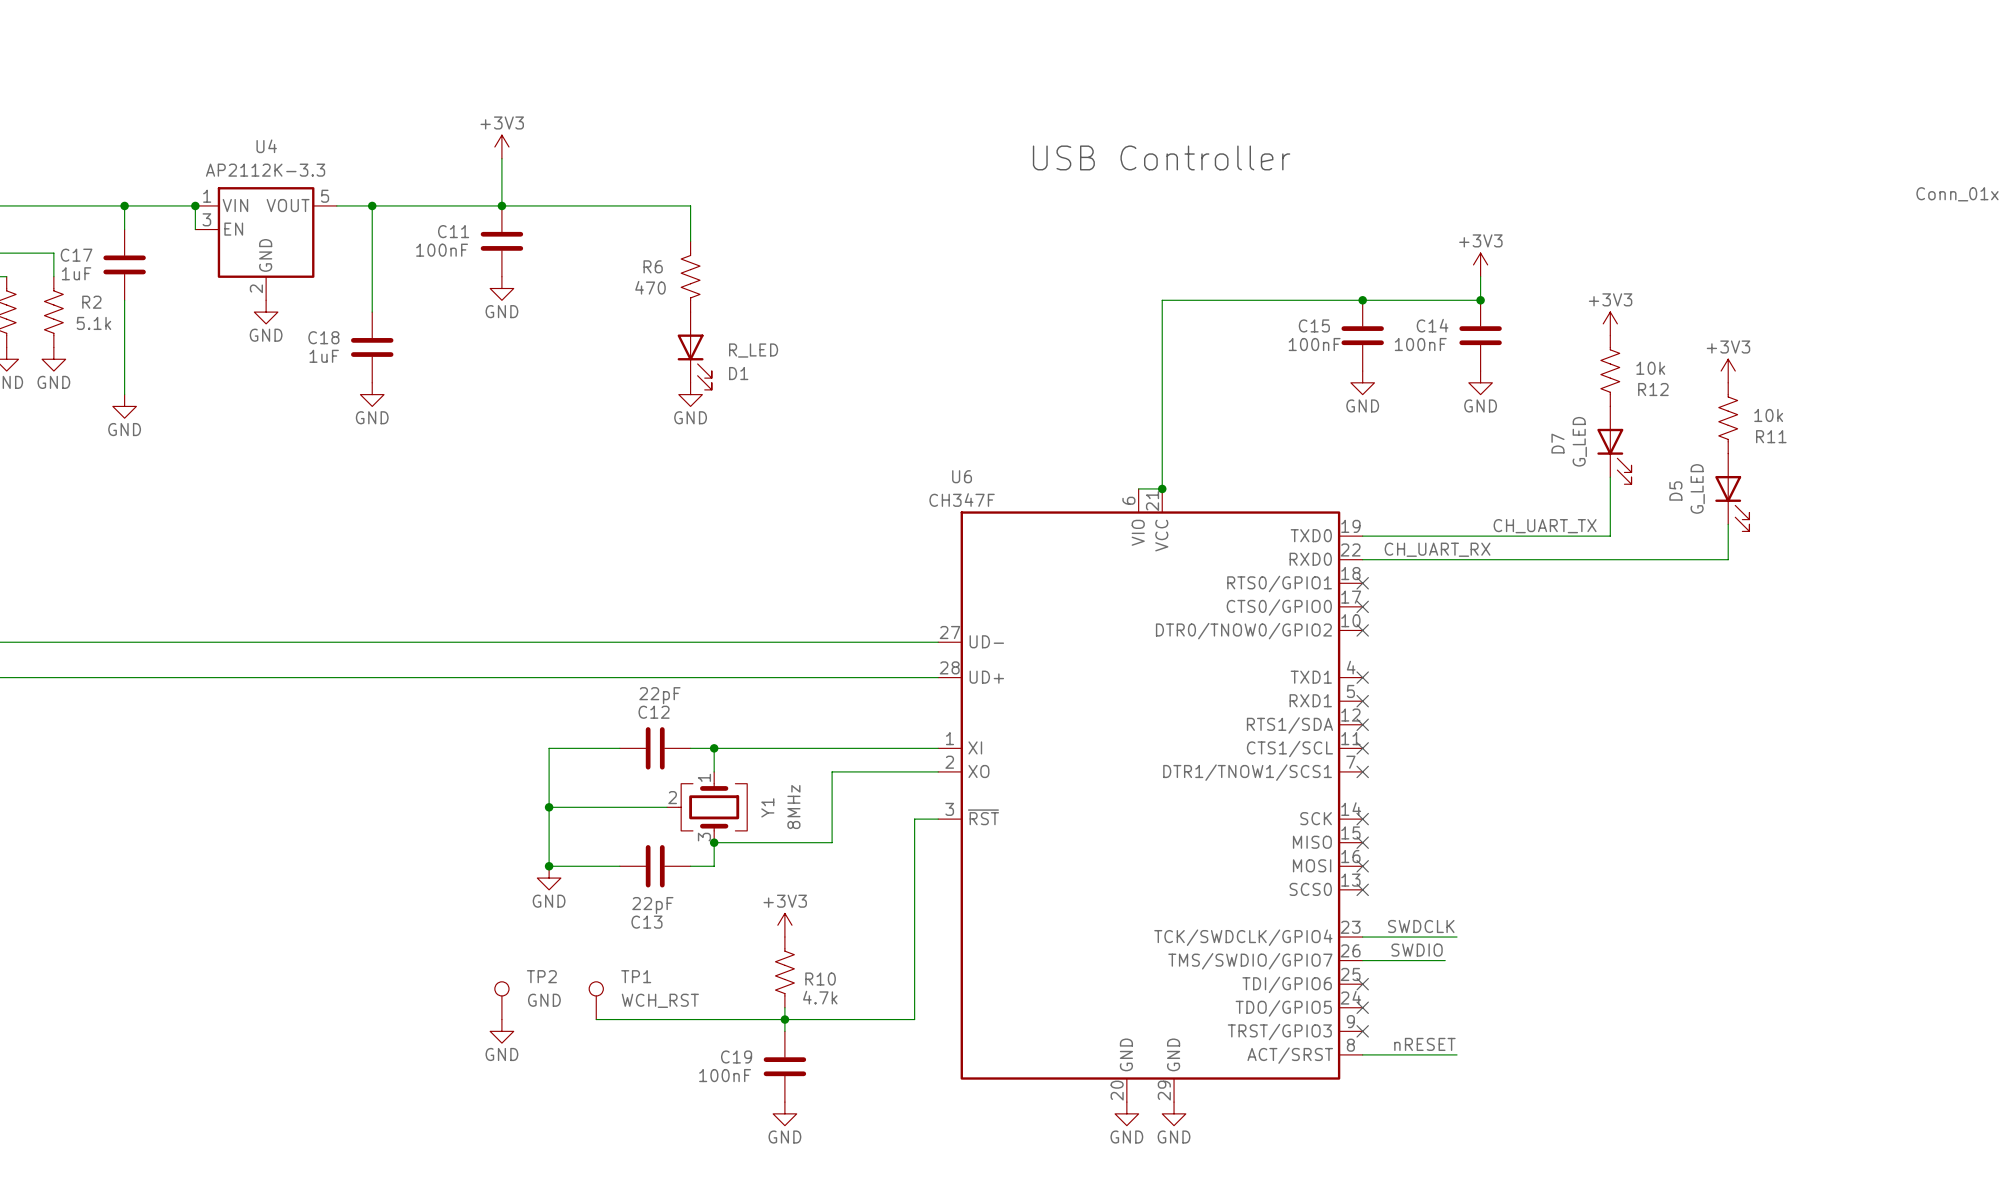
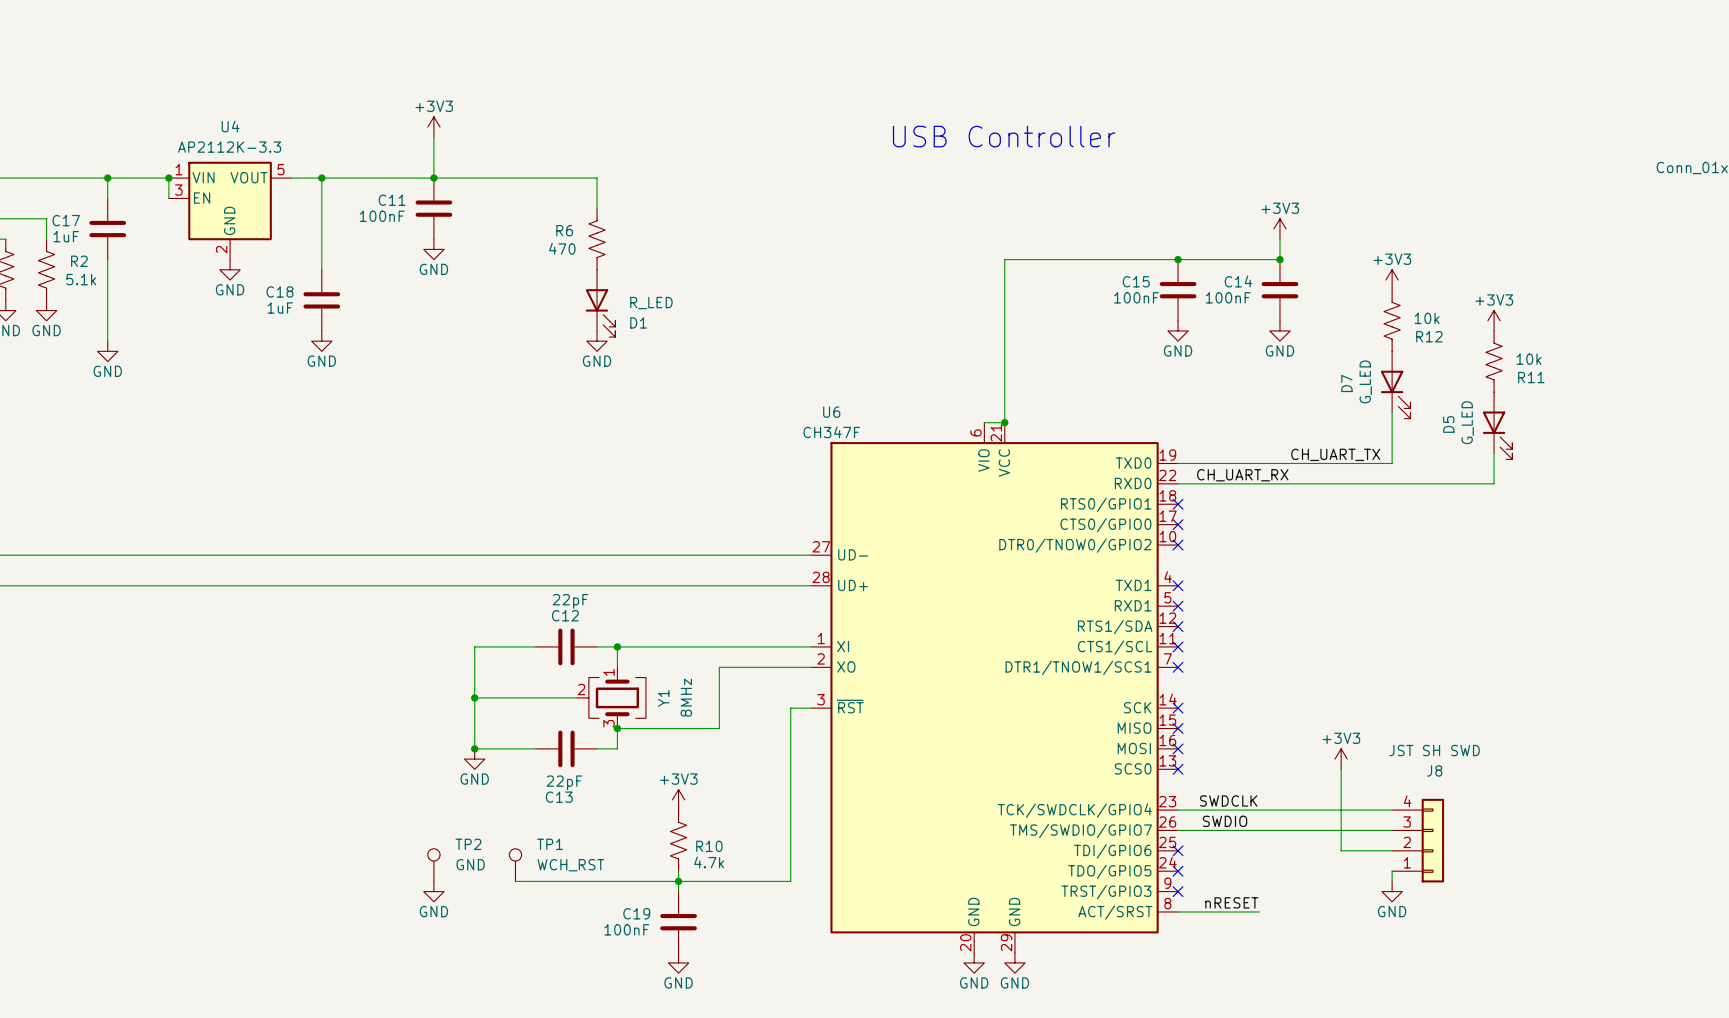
power symbol: none -> +3V3 (1341, 759)
wire: none -> (1341, 769) (1341, 850) (1392, 850)
wire: none -> (1259, 810) (1392, 810)
wire: none -> (1249, 830) (1392, 830)
J8: none -> JST SH SWD (1418, 840)
wire: none -> (1392, 871) (1392, 881)
power symbol: none -> GND (1392, 891)

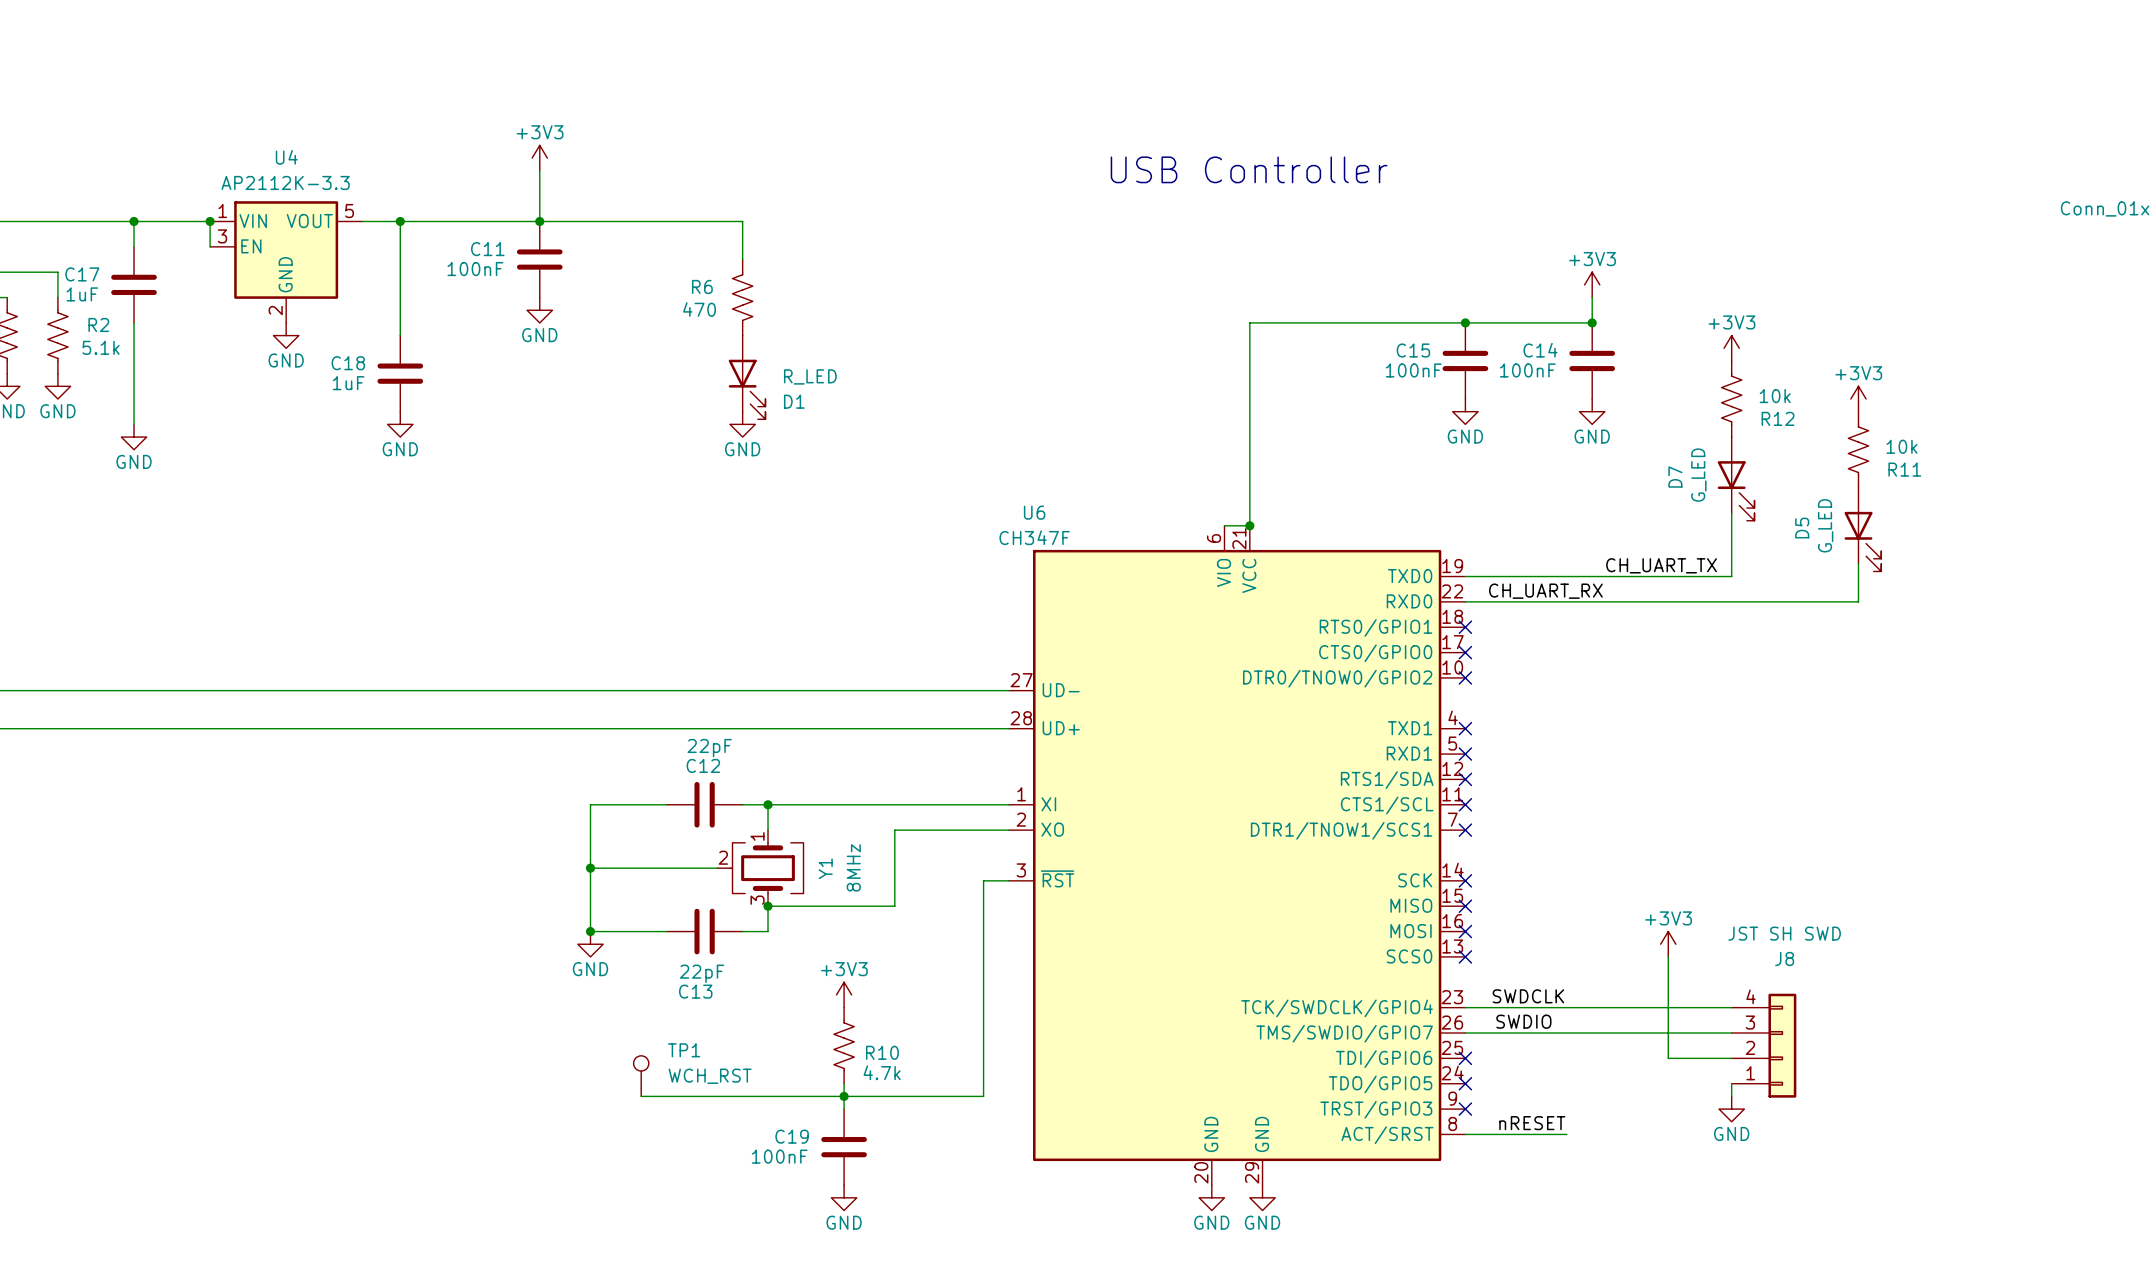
TP2: GND (433, 865) -> none
power symbol: GND (433, 891) -> none

